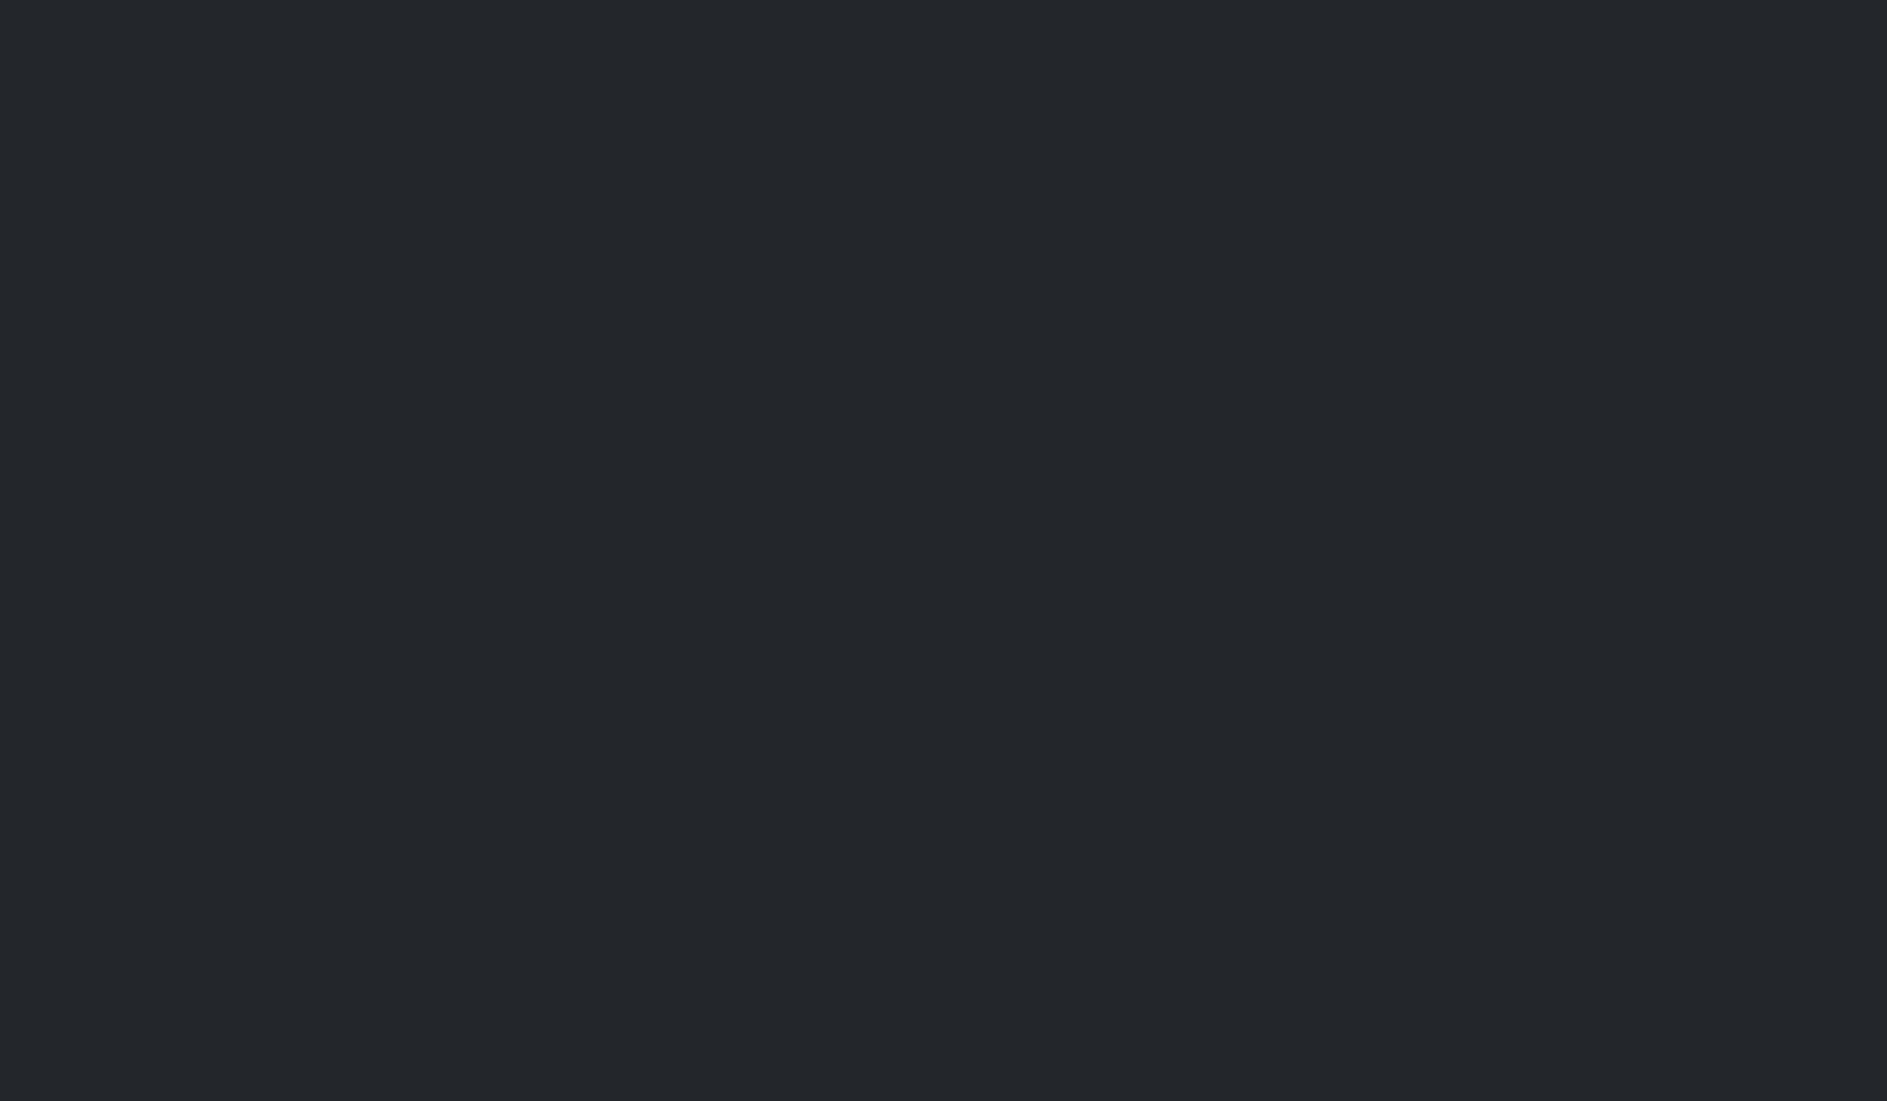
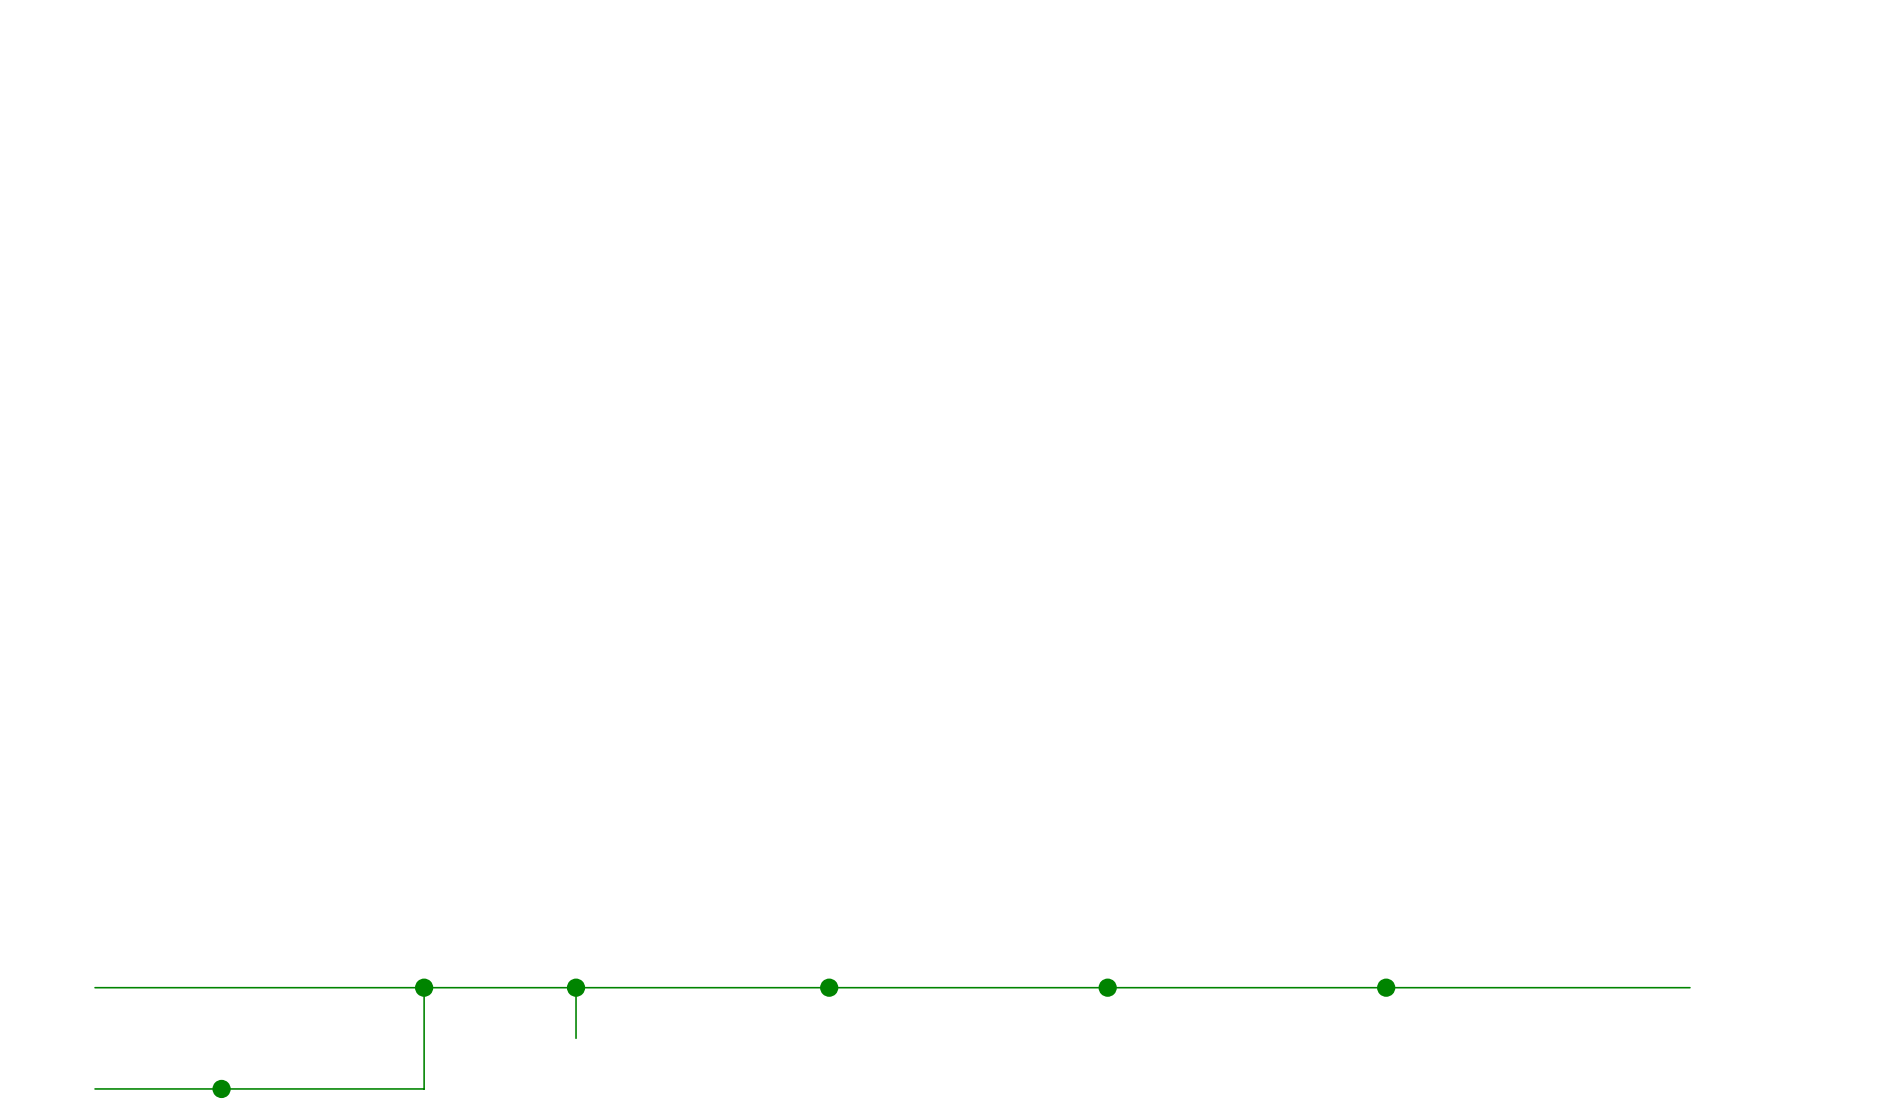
wire: none -> (94, 987) (1689, 987)
wire: none -> (424, 987) (424, 1088) (94, 1088)
junction: none -> (424, 987)
wire: none -> (576, 987) (576, 1038)
junction: none -> (576, 987)
junction: none -> (829, 987)
junction: none -> (1107, 987)
junction: none -> (1386, 987)
junction: none -> (221, 1088)

